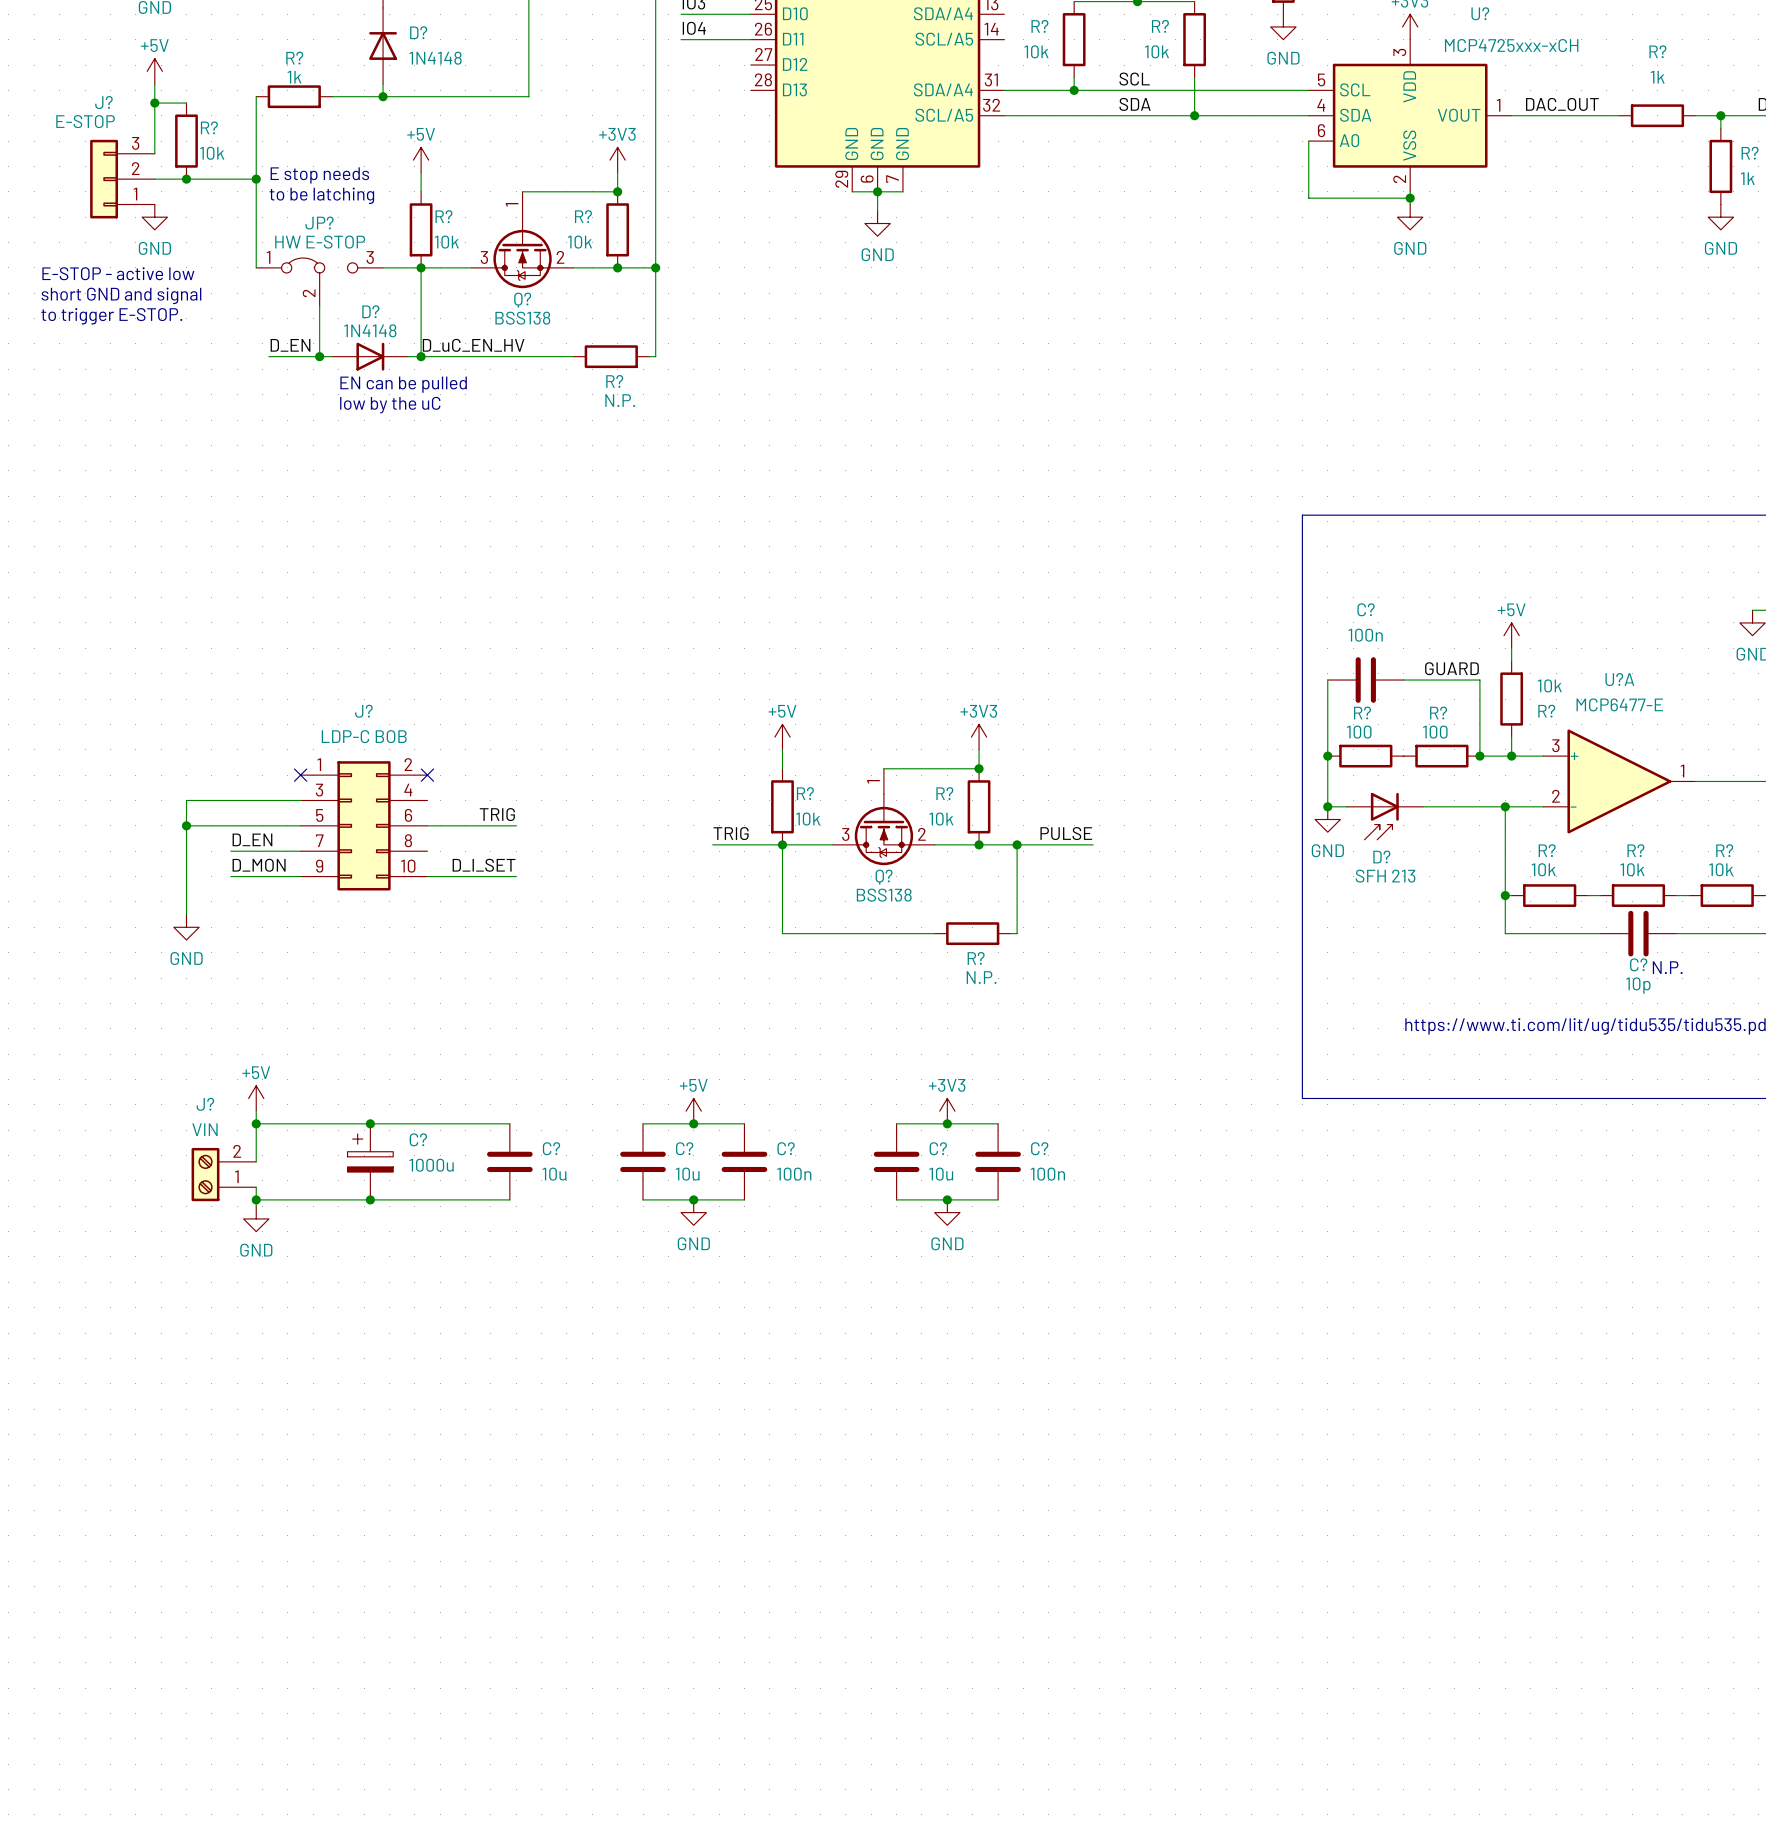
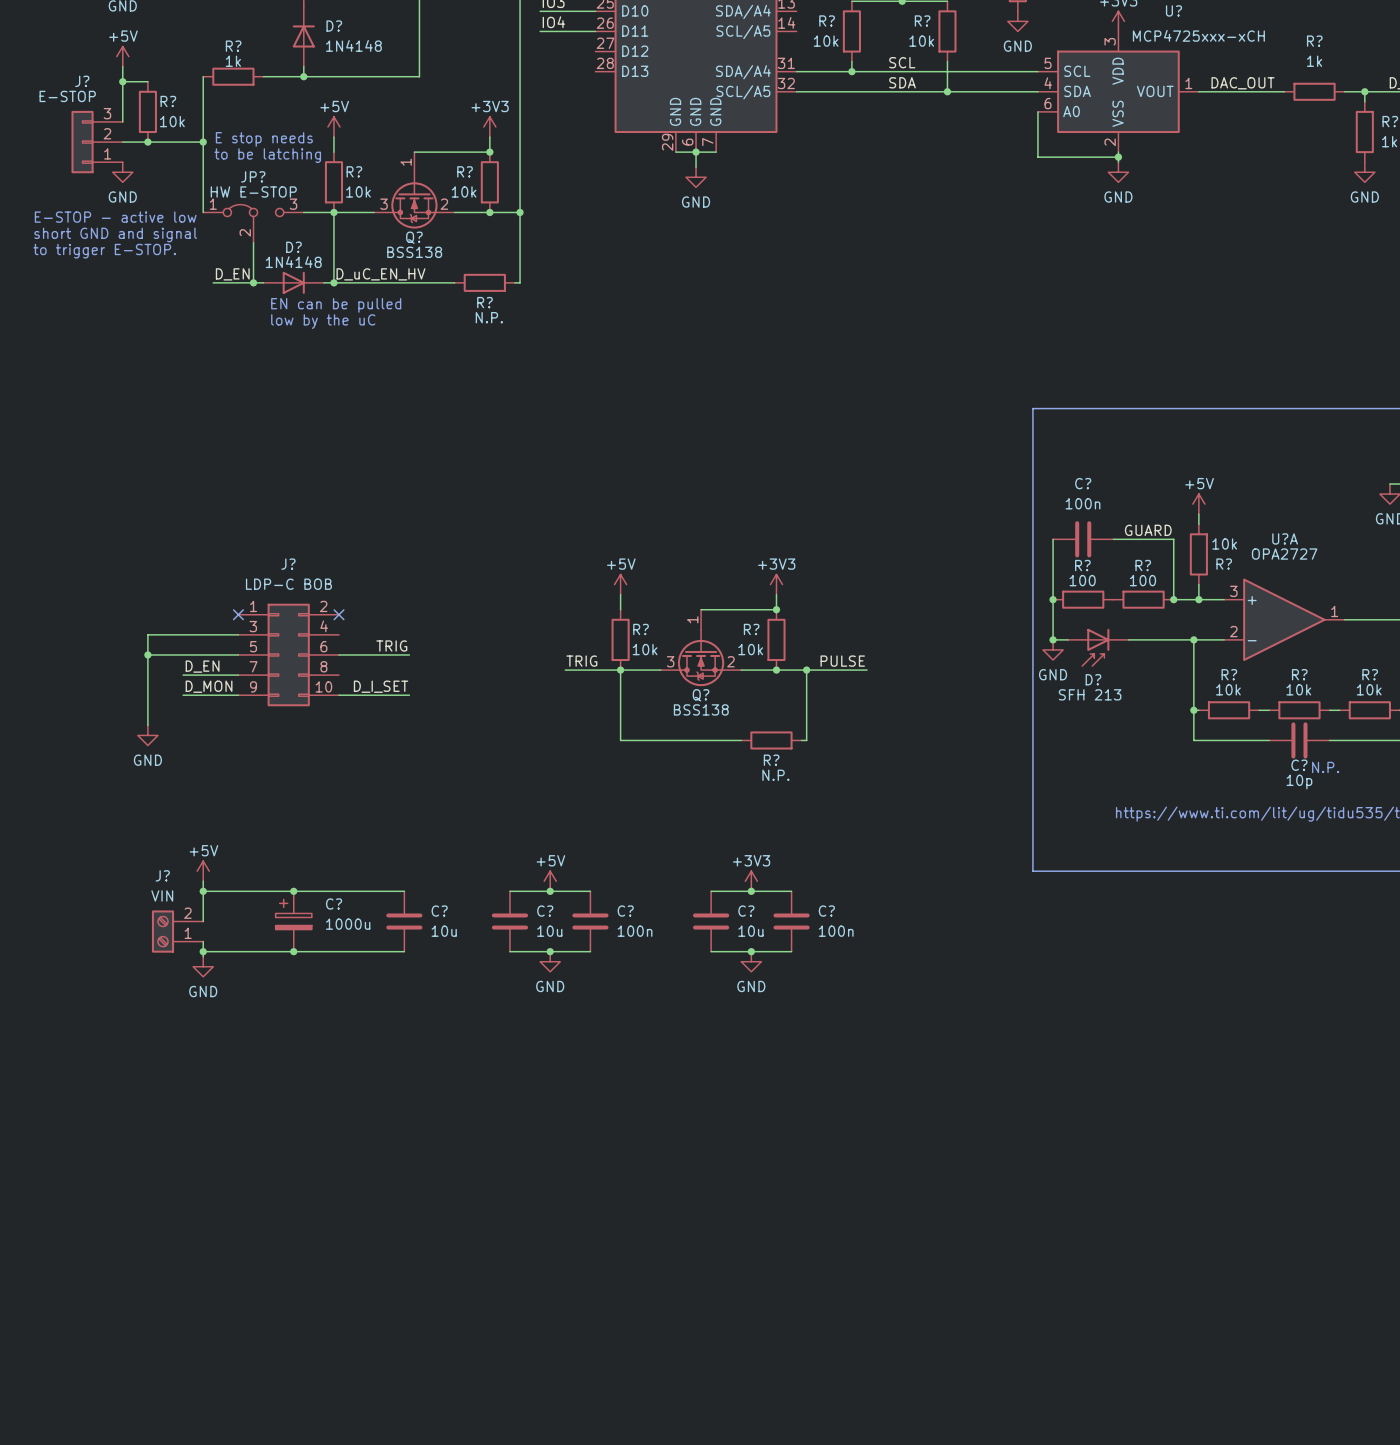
U?A value: MCP6477-E (1619, 704) -> OPA2727 (1284, 554)

